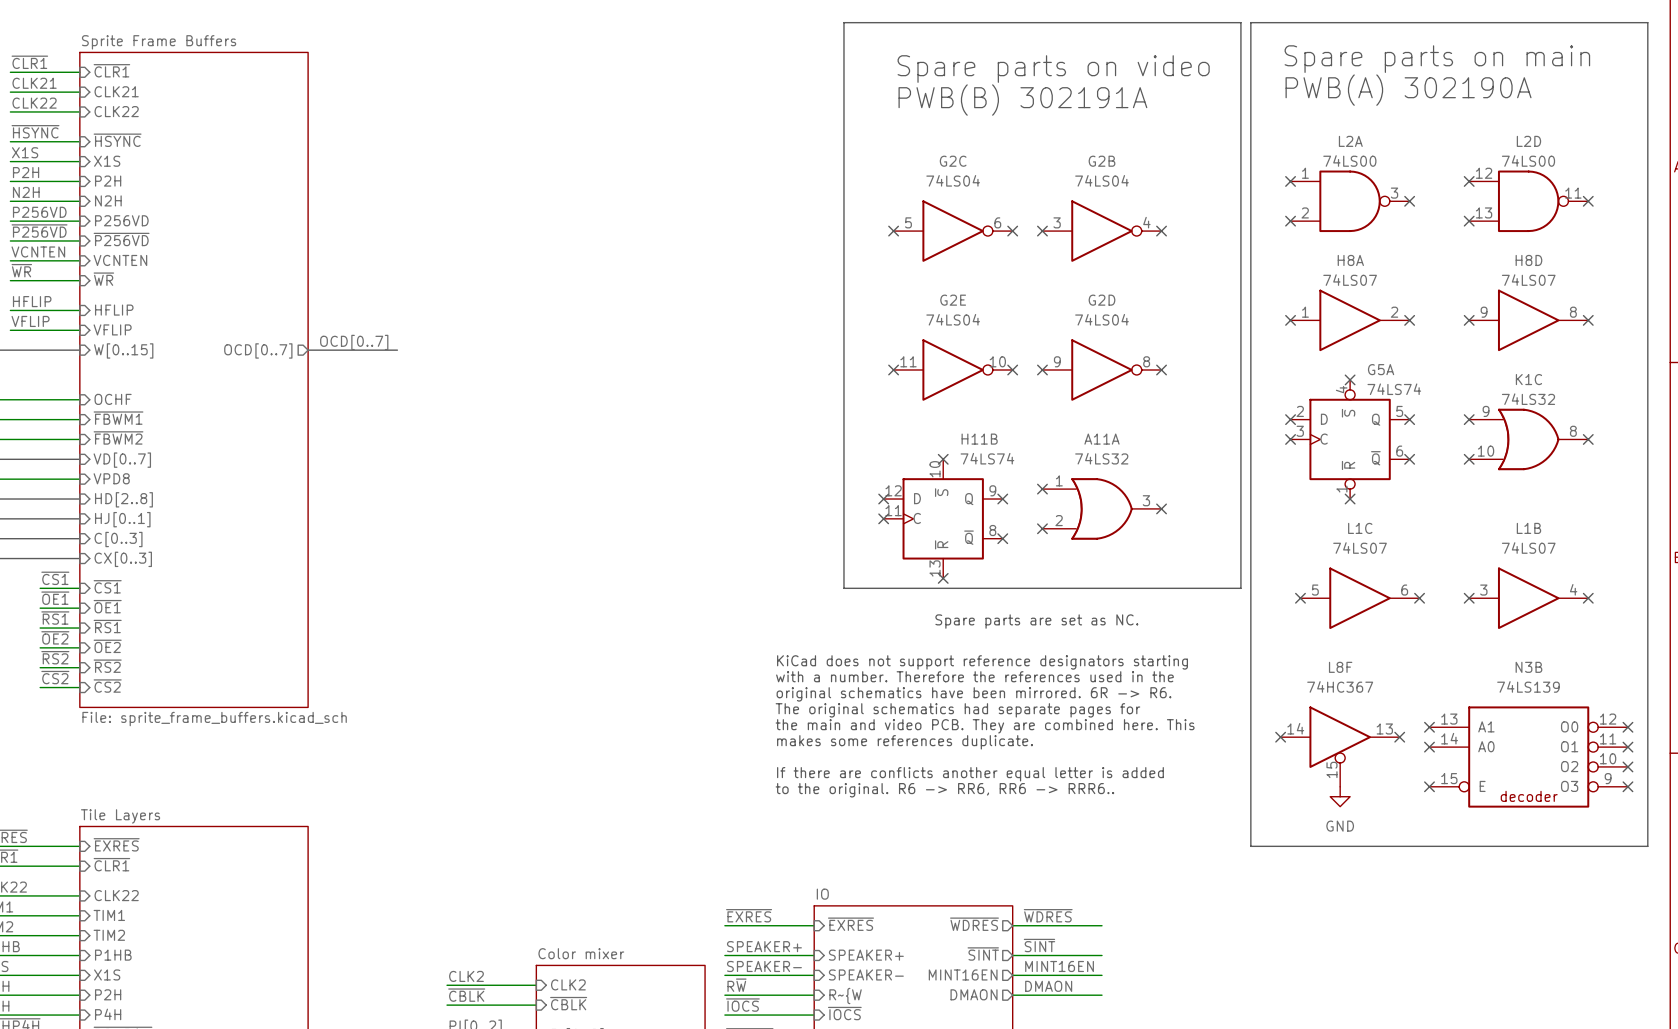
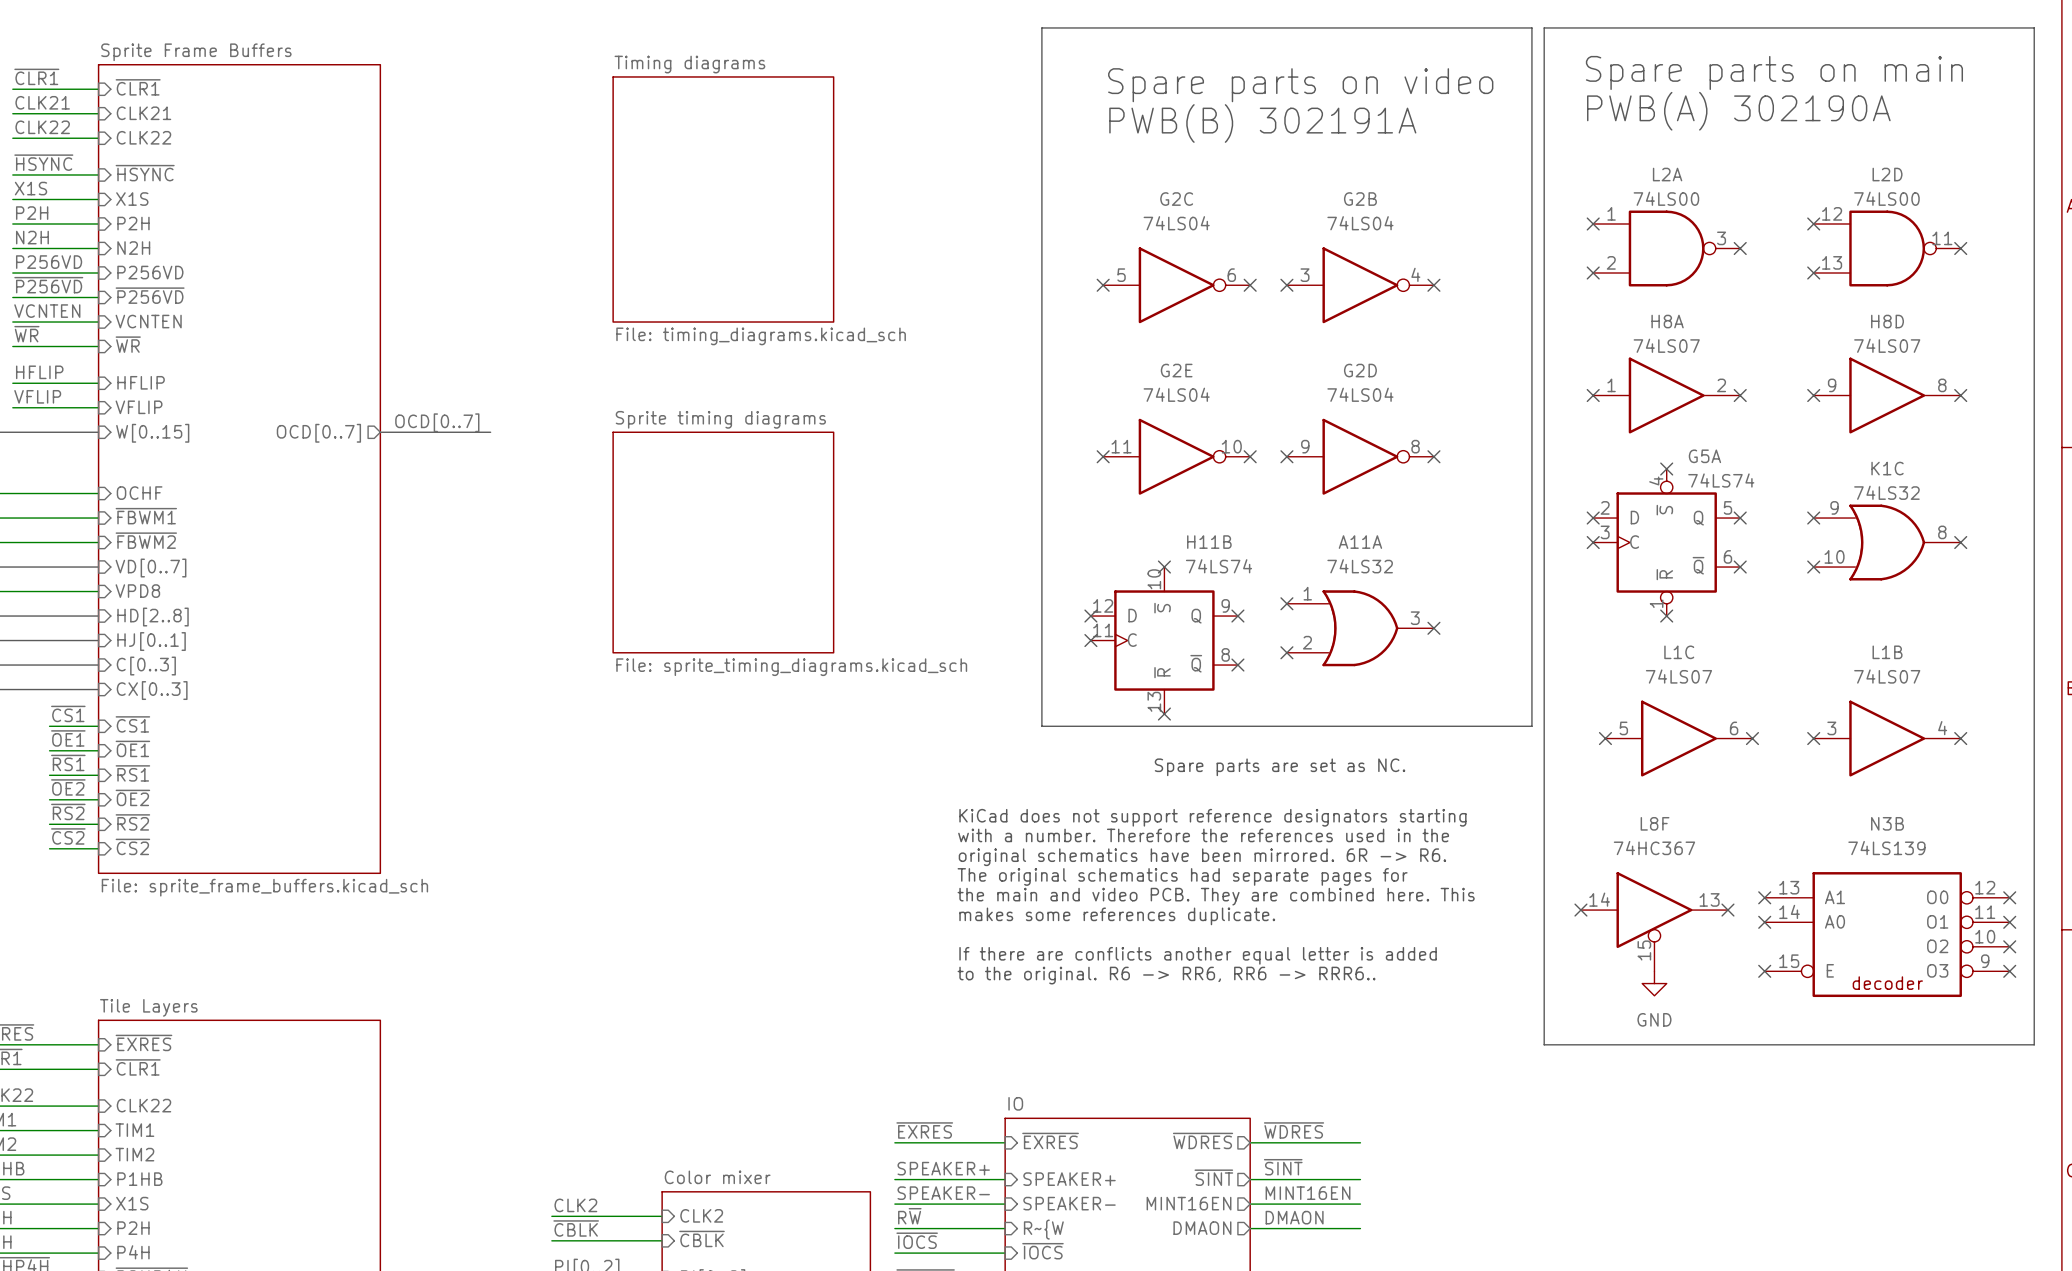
sheet Timing diagrams: none -> File: timing_diagrams.kicad_sch (723, 199)
sheet Sprite timing diagrams: none -> File: sprite_timing_diagrams.kicad_sch (723, 542)

